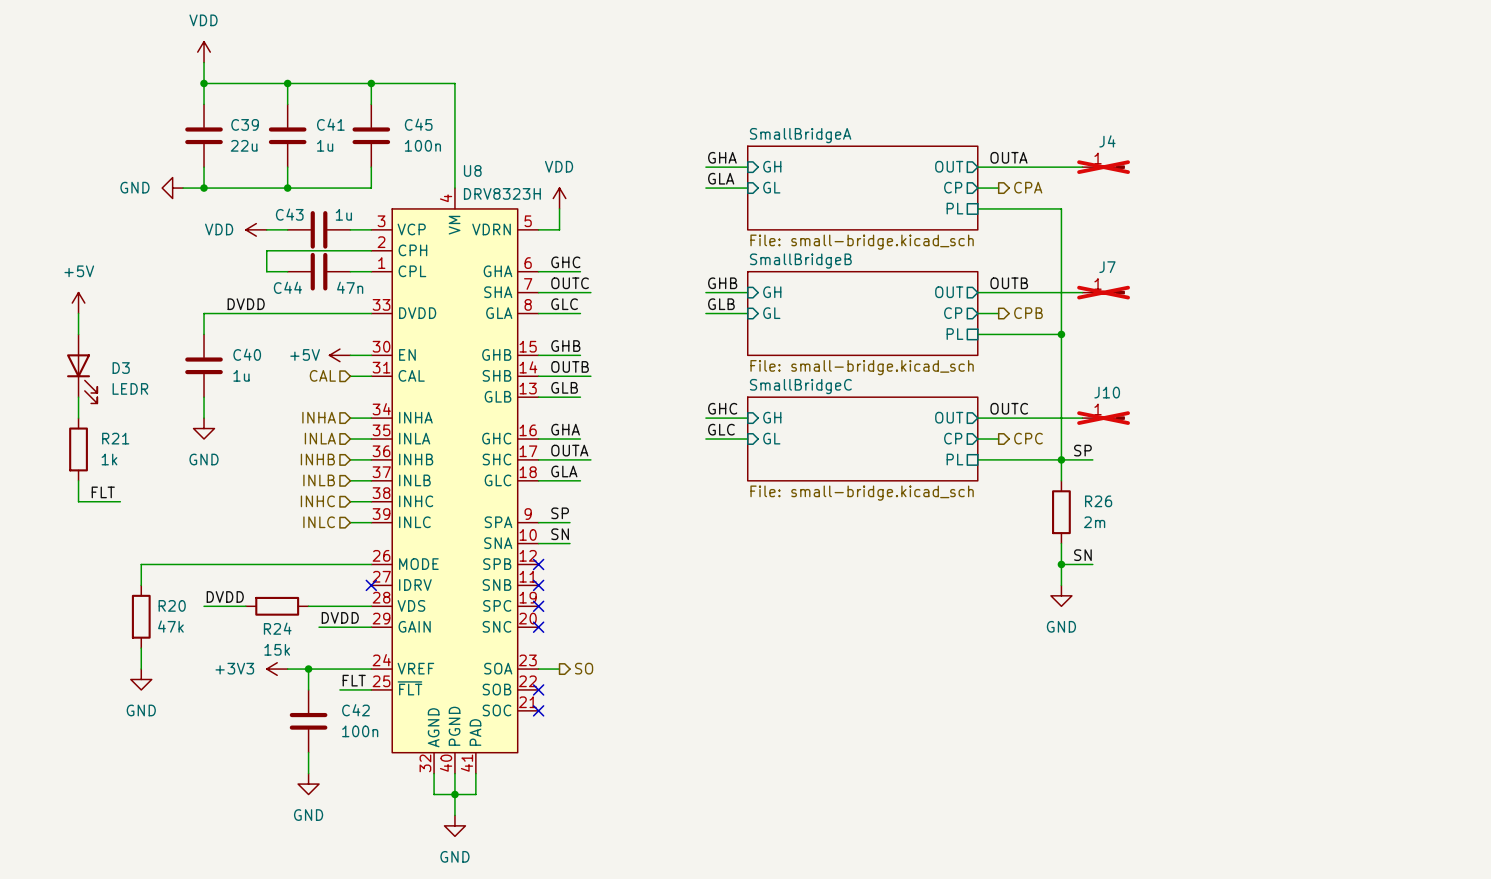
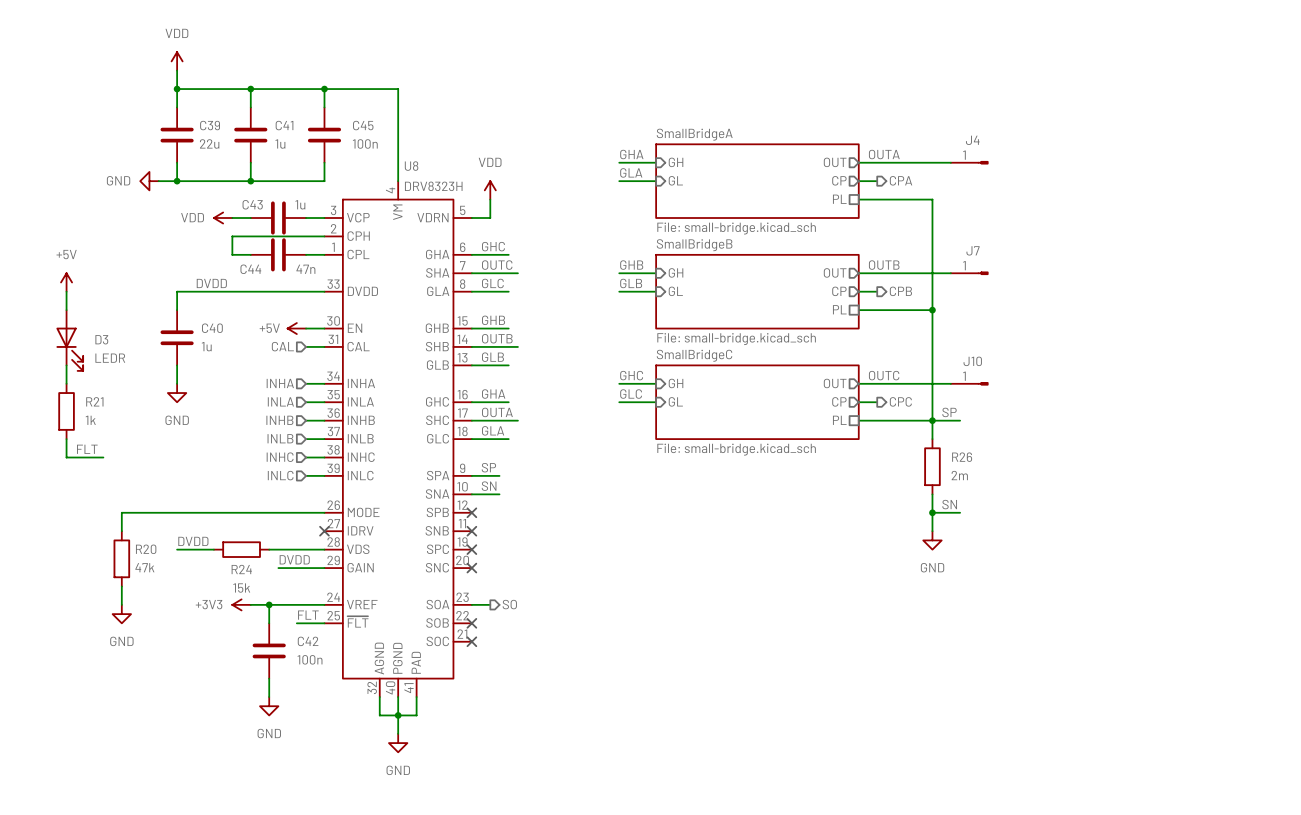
J4 do-not-place cross: (1103, 167) -> none
J7 do-not-place cross: (1103, 292) -> none
J10 do-not-place cross: (1103, 418) -> none

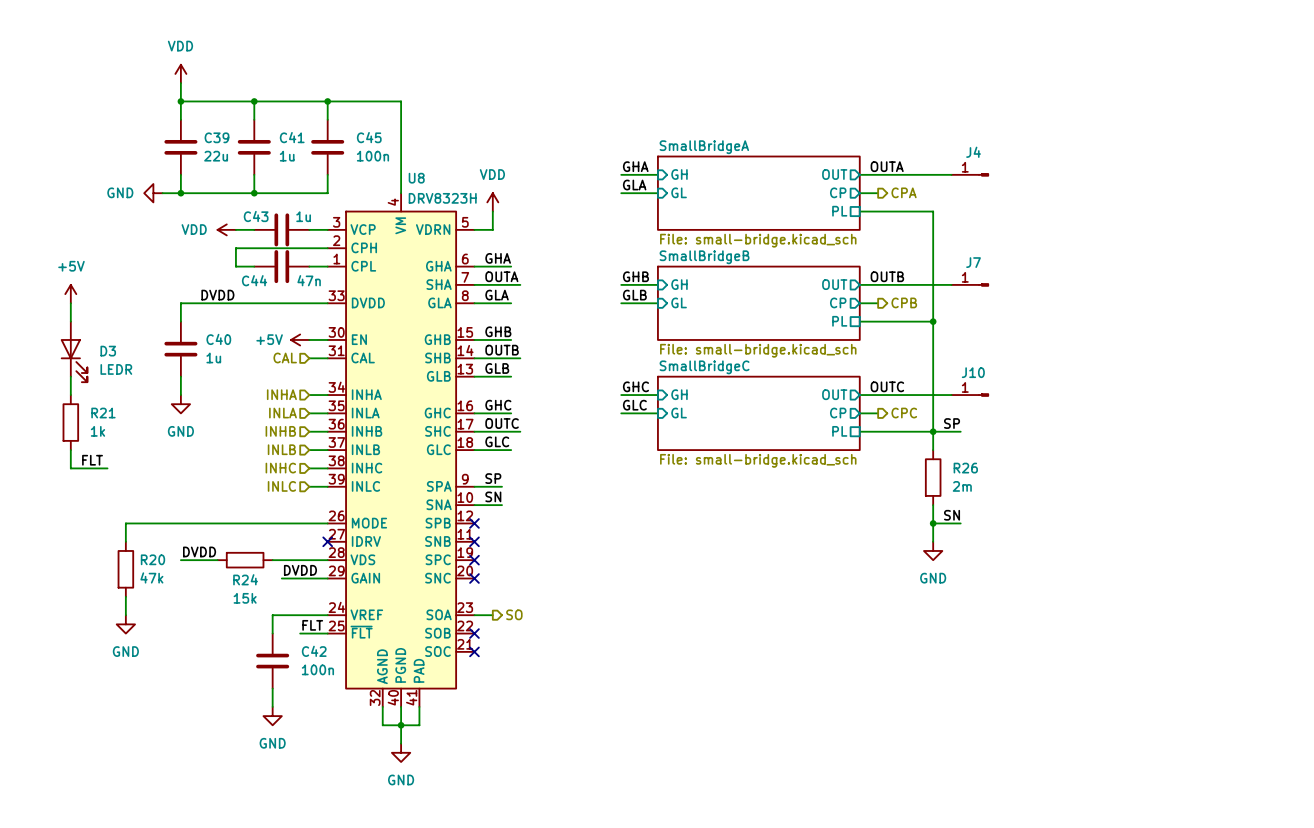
label: GHC (493, 246) -> GHA (498, 258)
label: OUTC (497, 265) -> OUTA (501, 276)
label: GLC (492, 283) -> GLA (497, 295)
label: GHA (493, 394) -> GHC (498, 405)
label: OUTA (497, 412) -> OUTC (502, 423)
label: GLA (493, 430) -> GLC (497, 441)
power symbol: +3V3 (241, 604) -> none
wire: (250, 604) (269, 604) -> none
junction: (269, 604) -> none

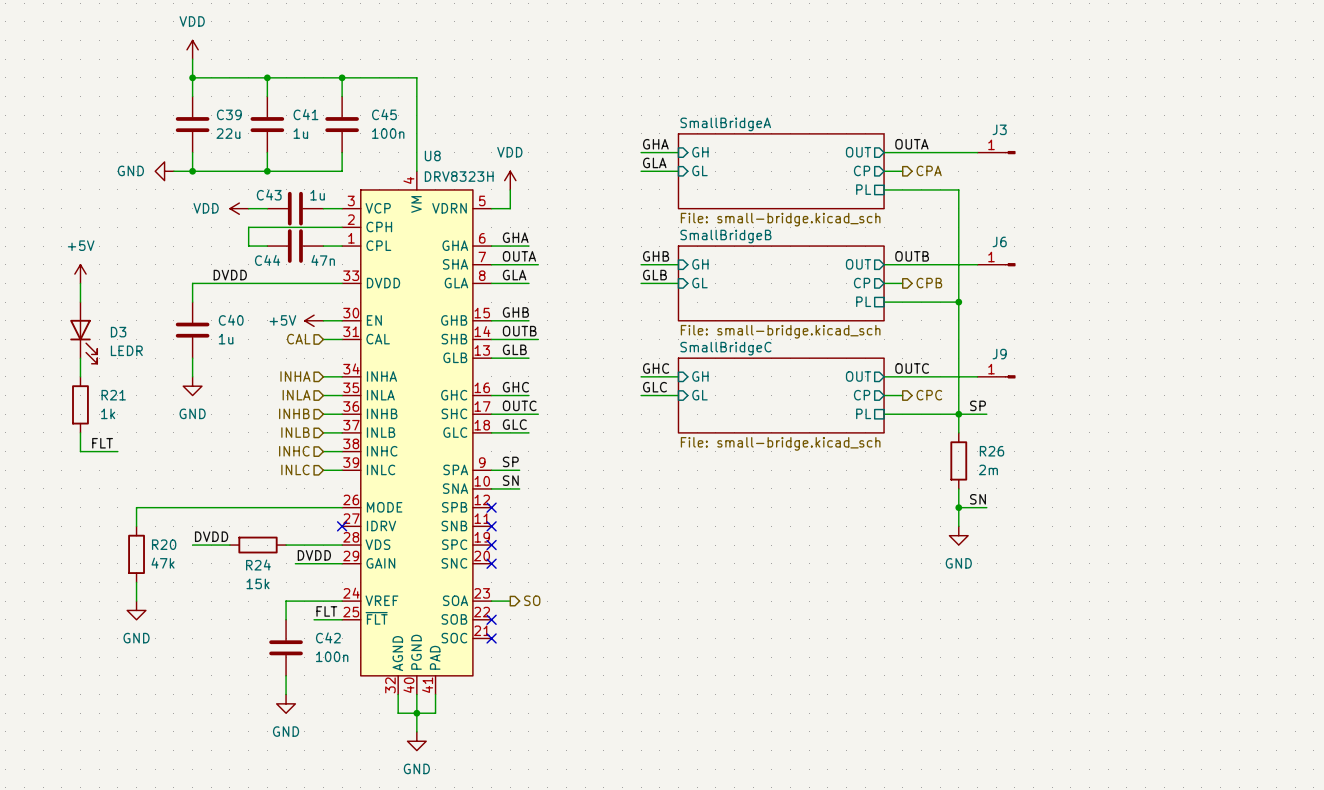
J4 name: J4 (973, 152) -> J3 (999, 129)
J7 name: J7 (973, 262) -> J6 (999, 241)
J10 name: J10 (973, 372) -> J9 (999, 354)

